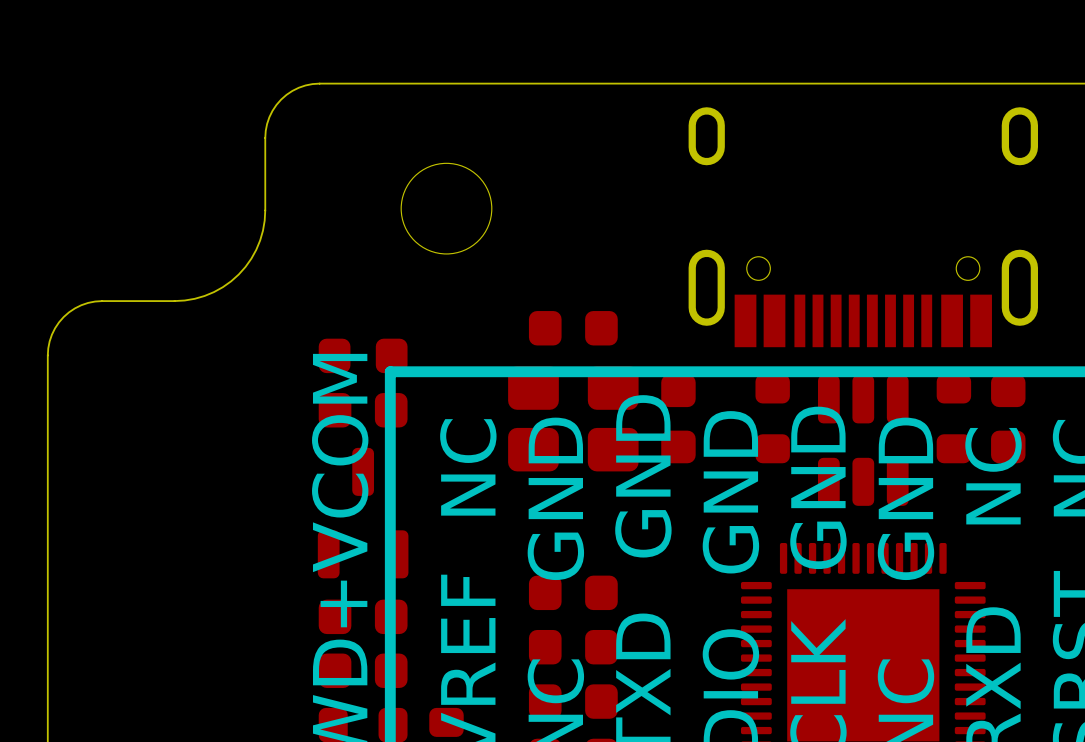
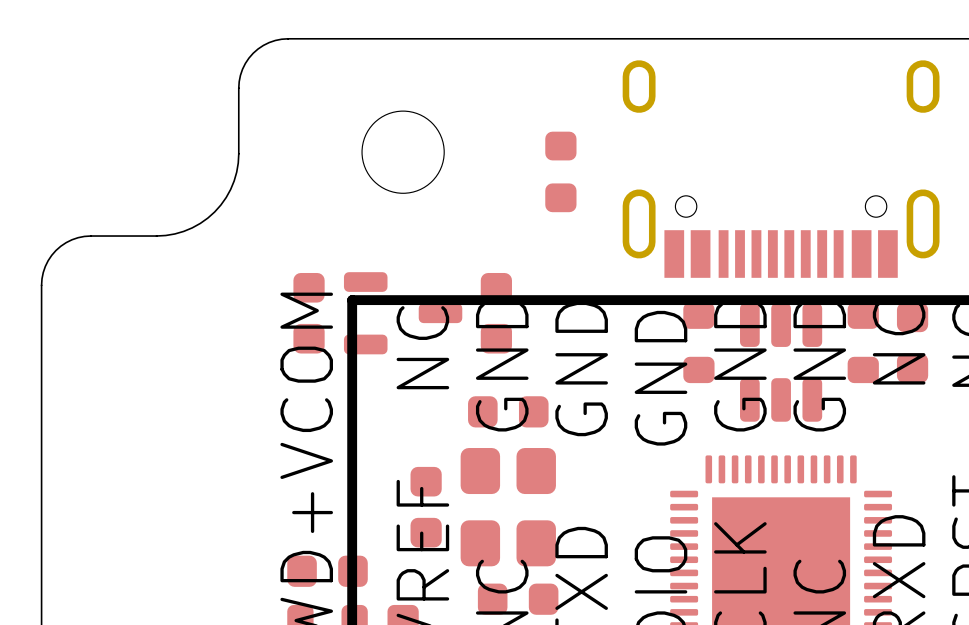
part rotation: 0° (573, 328) -> 90° clockwise (496, 313)
part position: (573, 328) -> (496, 313)
part rotation: 0° (363, 355) -> 90° clockwise (560, 171)
part position: (363, 355) -> (560, 171)
part rotation: 0° (363, 410) -> 90° clockwise (309, 313)
part: (573, 418) -> none
part: (678, 418) -> none
part: none -> (508, 411)
part rotation: 0° (363, 513) -> 90° clockwise (403, 313)
part position: (363, 513) -> (403, 313)
part footprint: [528, 575, 618, 611] -> [460, 448, 556, 567]
part: none -> (426, 507)
part: (363, 616) -> none
part: (573, 647) -> none

